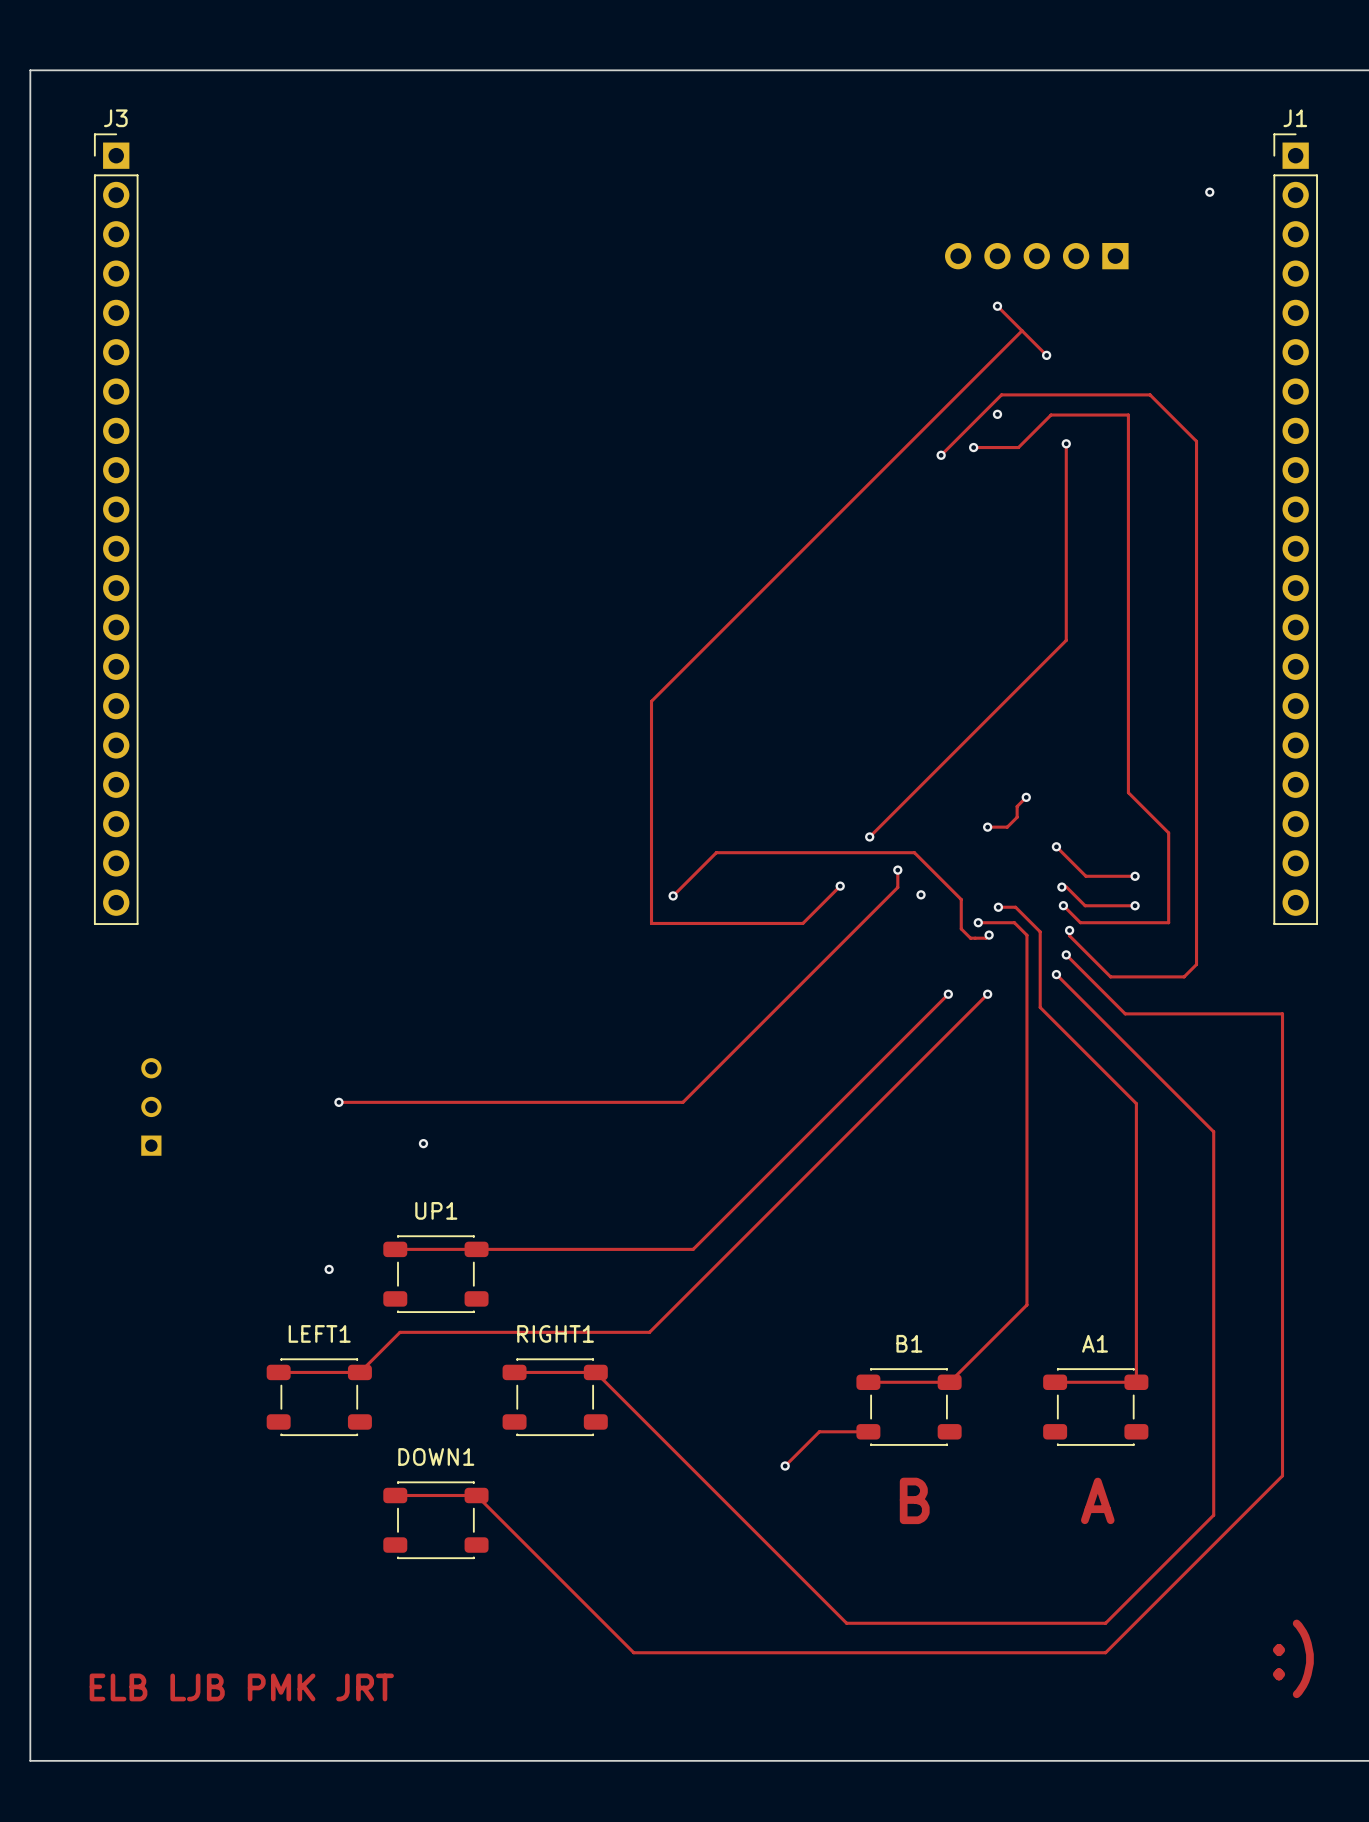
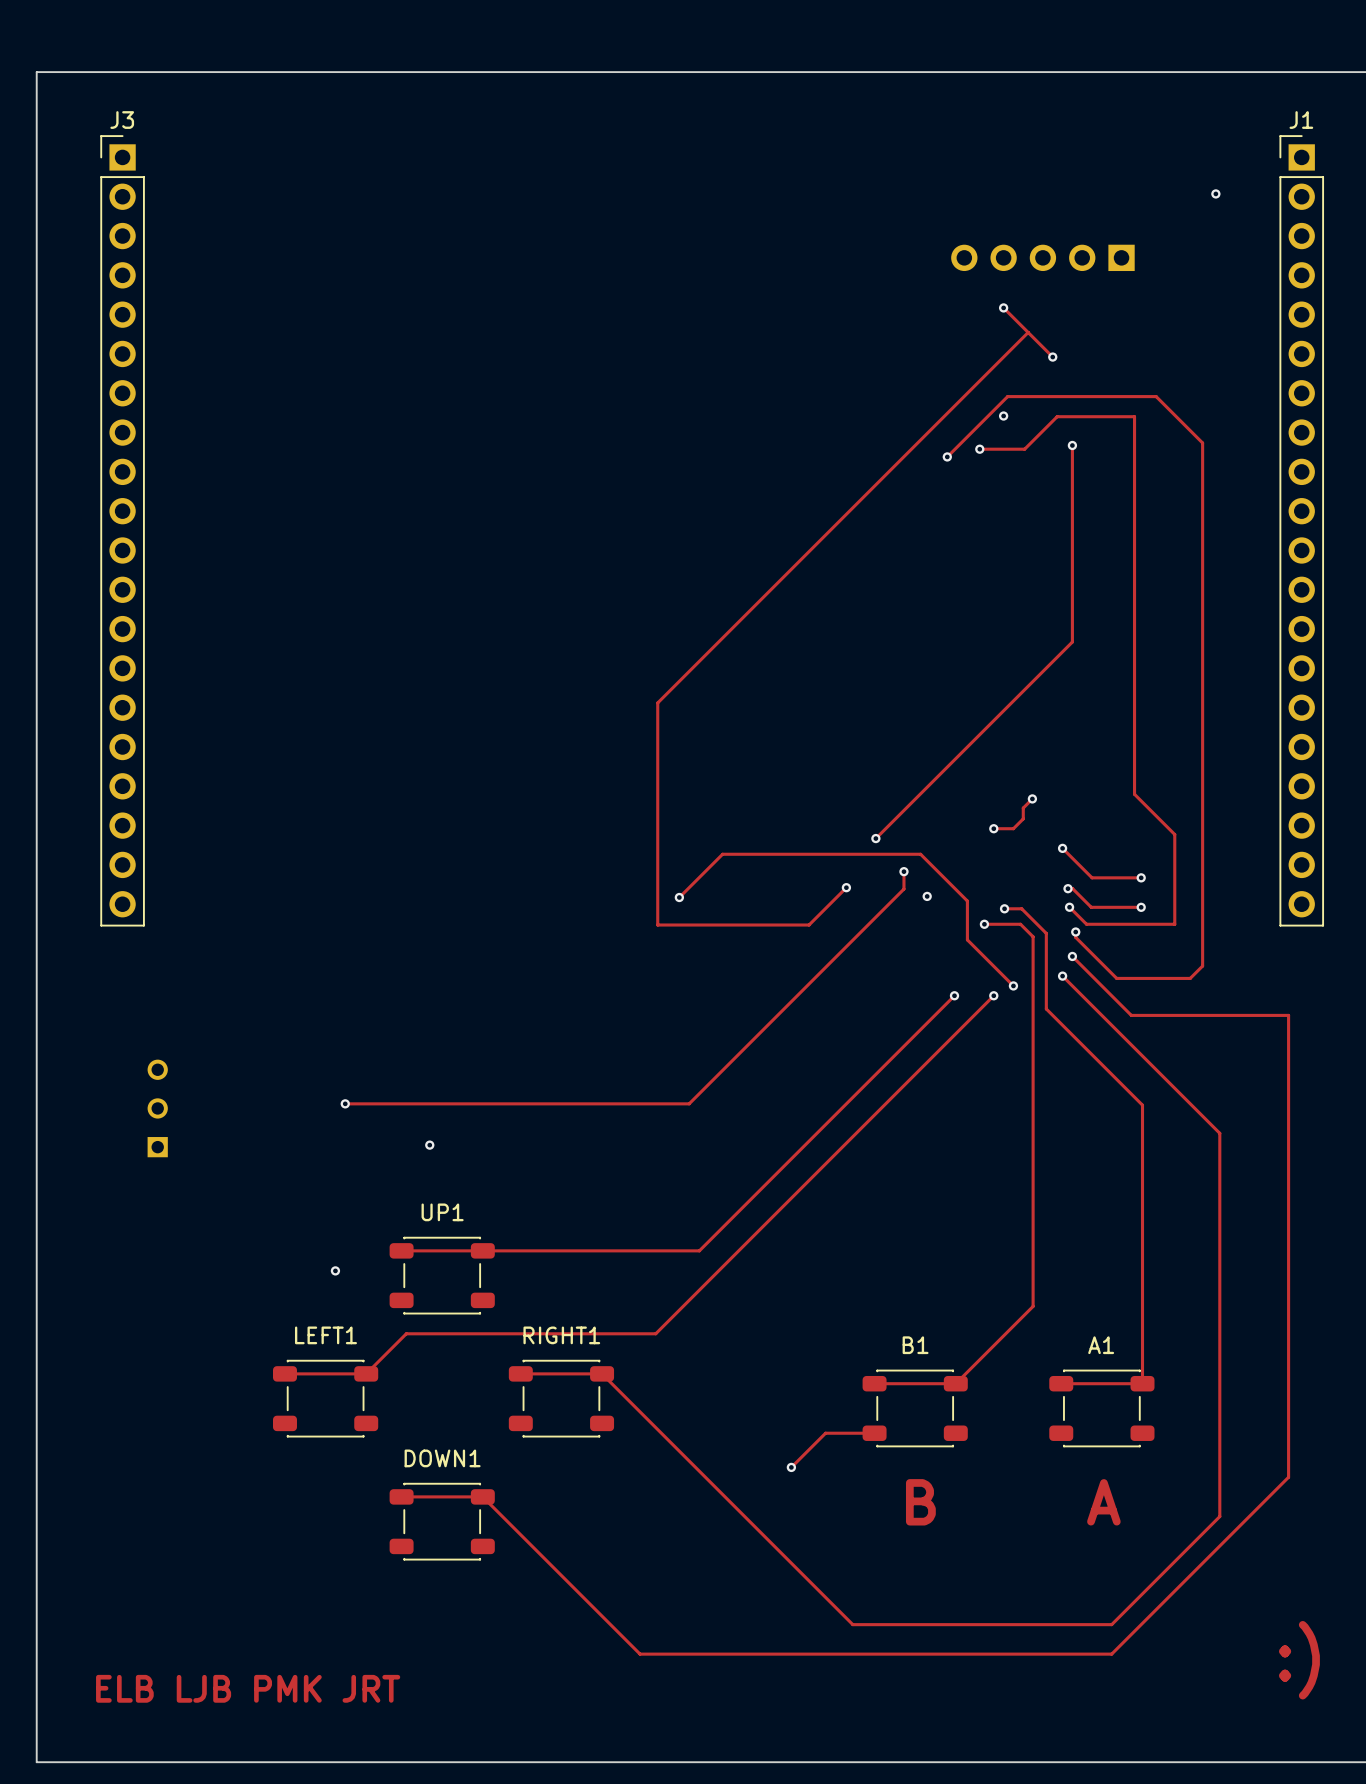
track: (961, 928) (970, 938) (986, 938) (989, 935) -> (967, 930) (967, 939) (1013, 985)
via position: (989, 935) -> (1013, 985)

